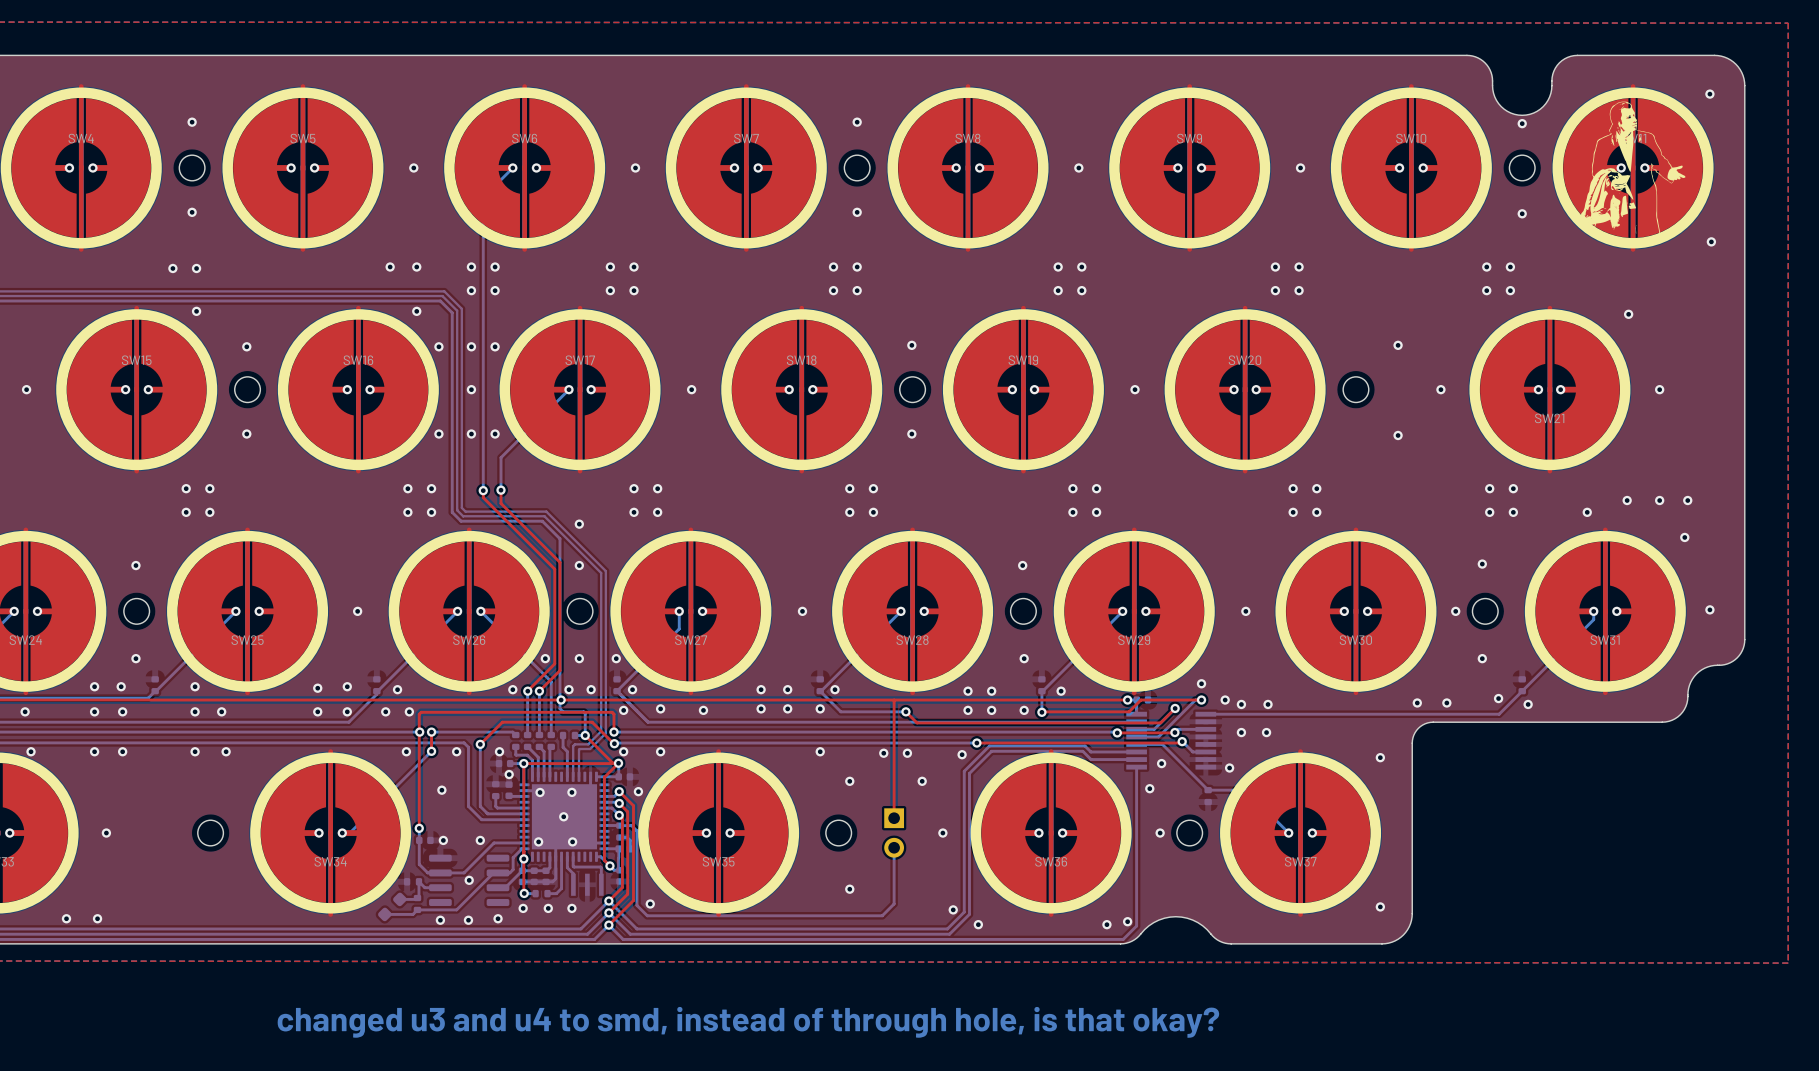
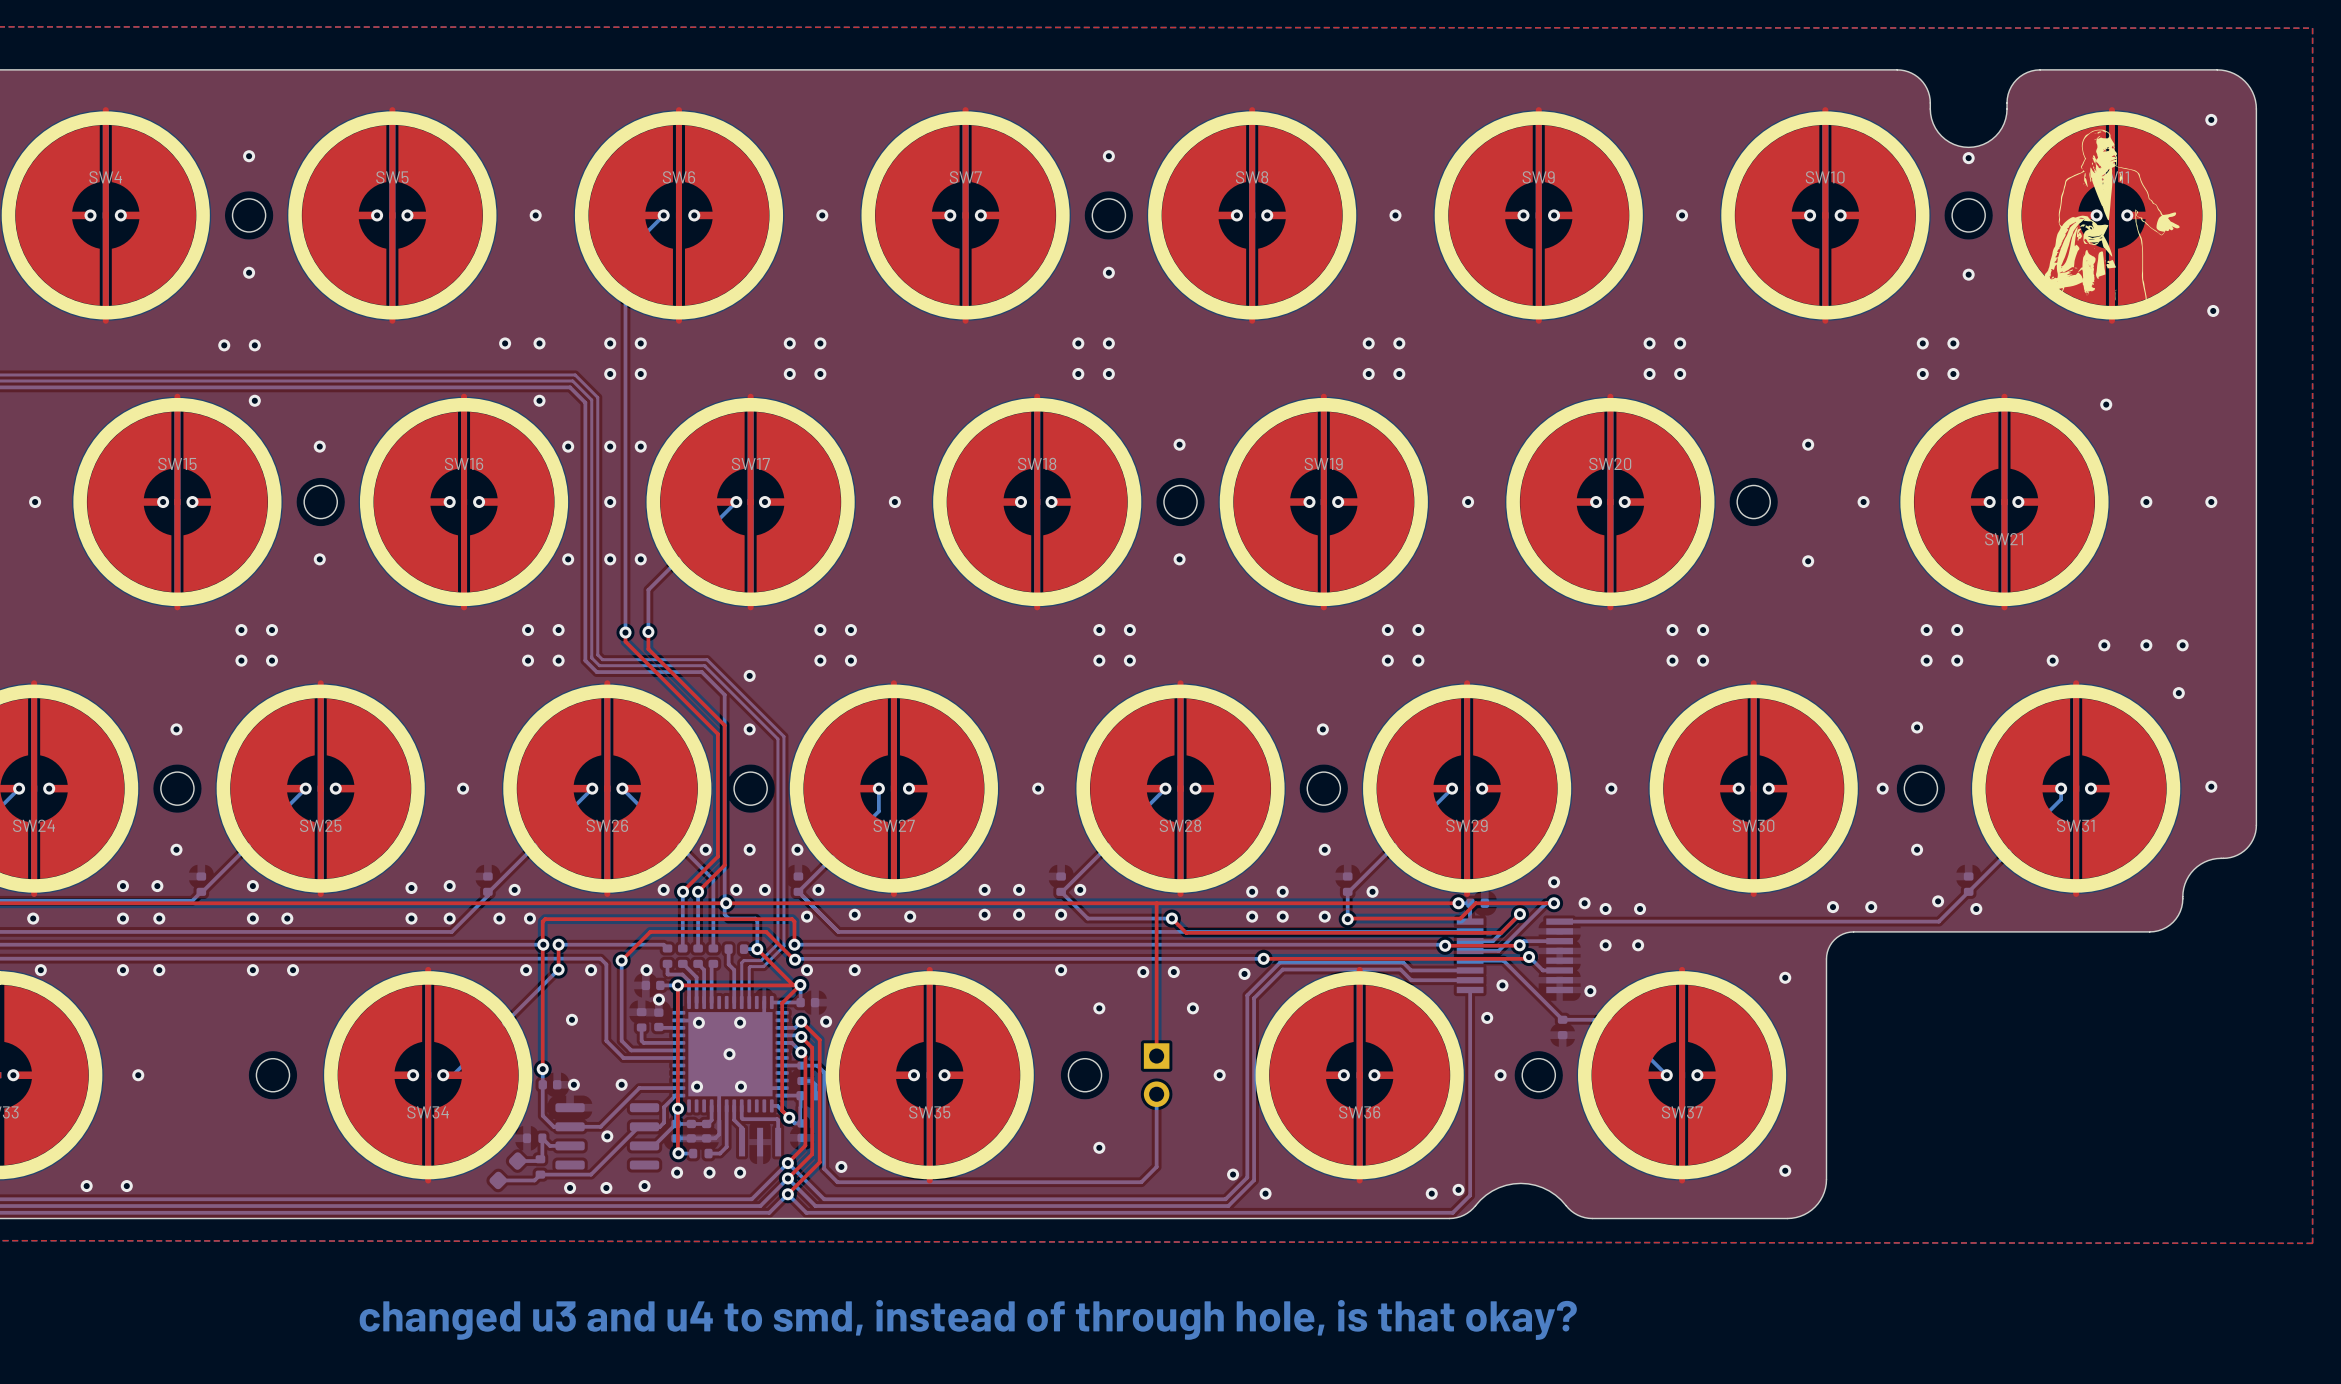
via: none -> (2211, 502)

